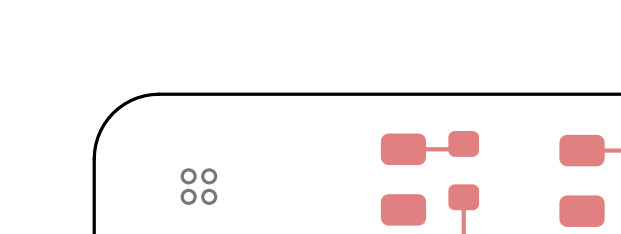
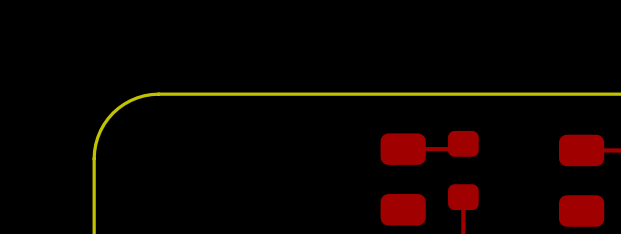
via: (188, 176) -> none
via: (209, 176) -> none
via: (188, 196) -> none
via: (209, 196) -> none

